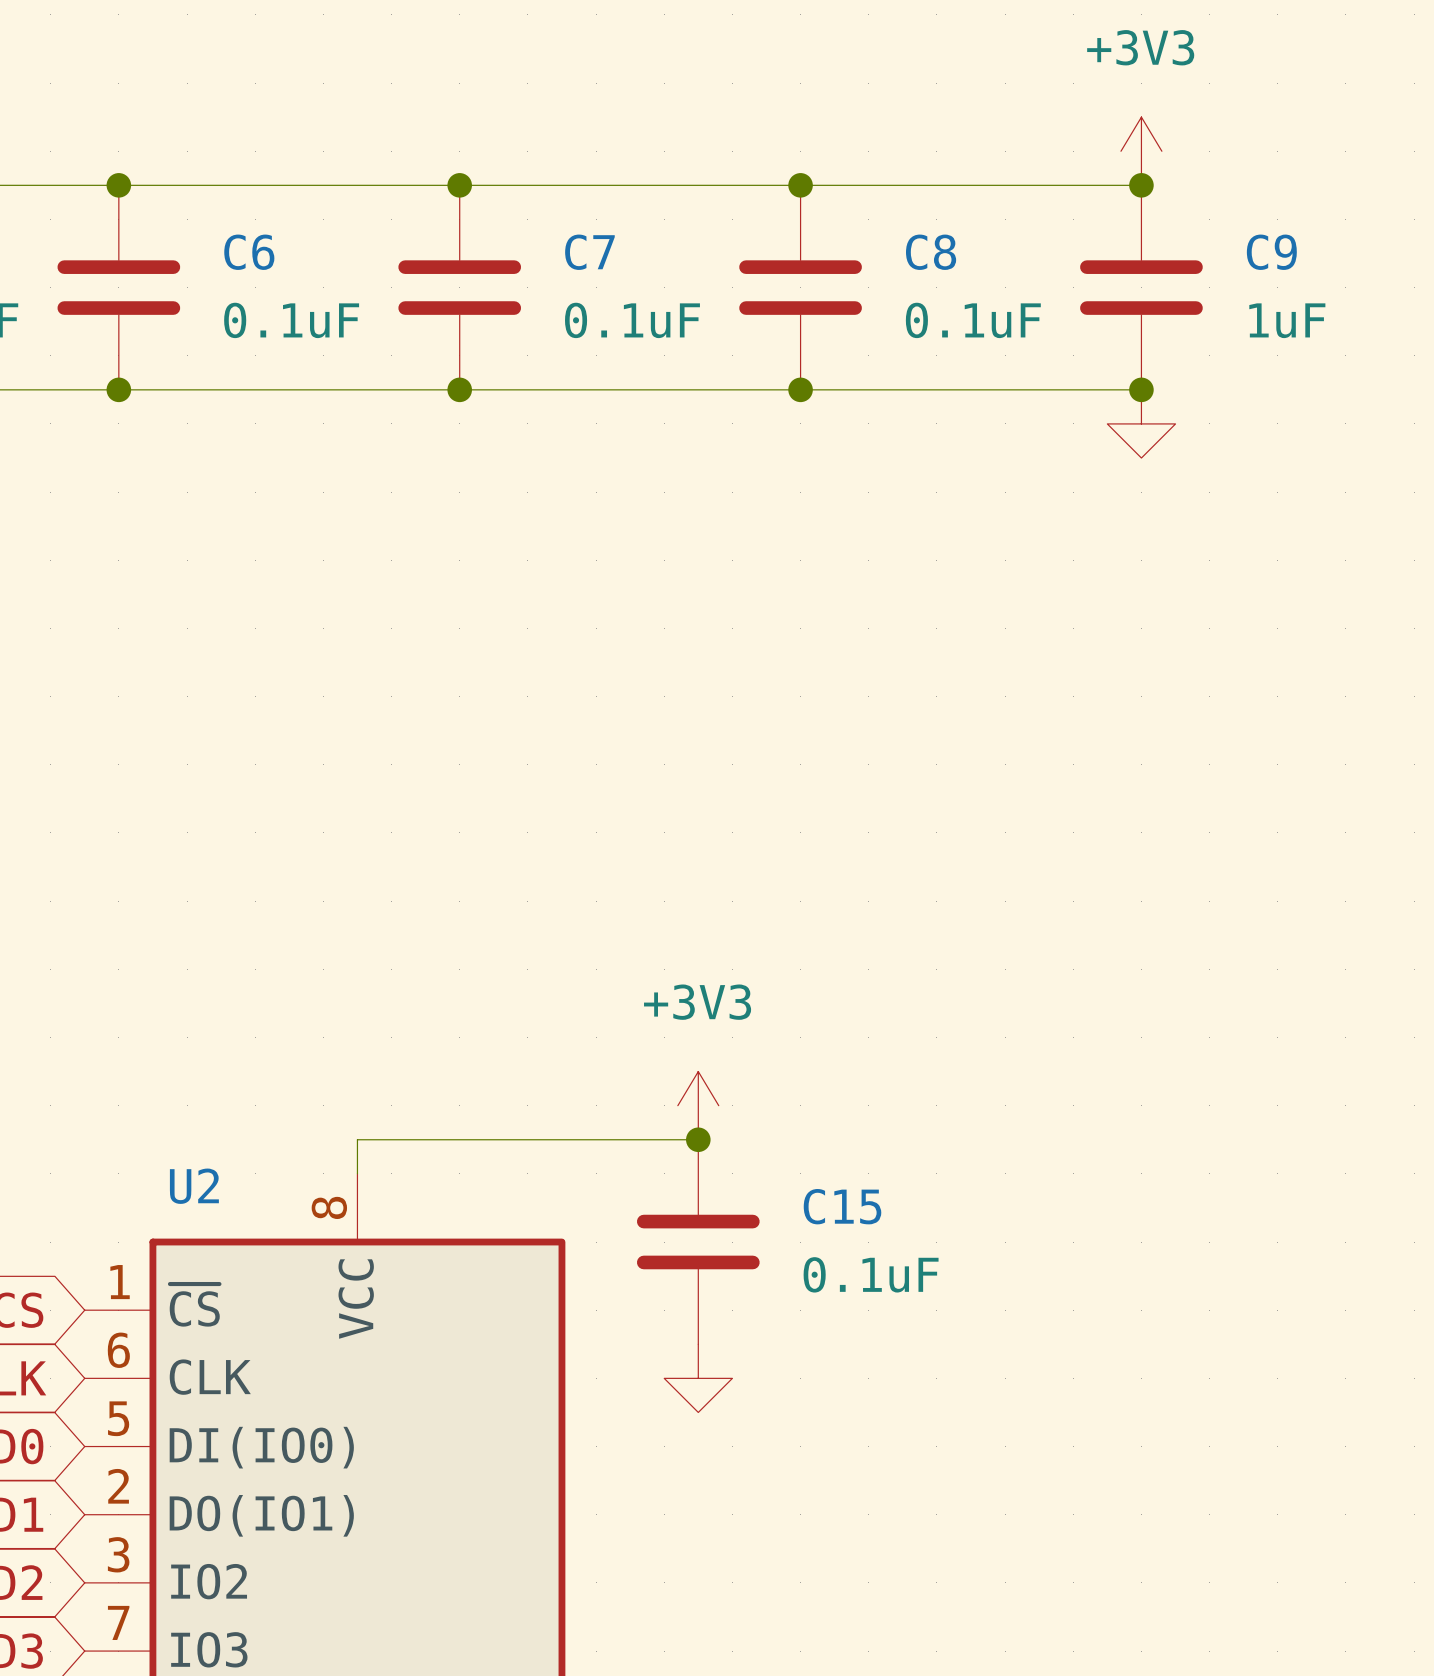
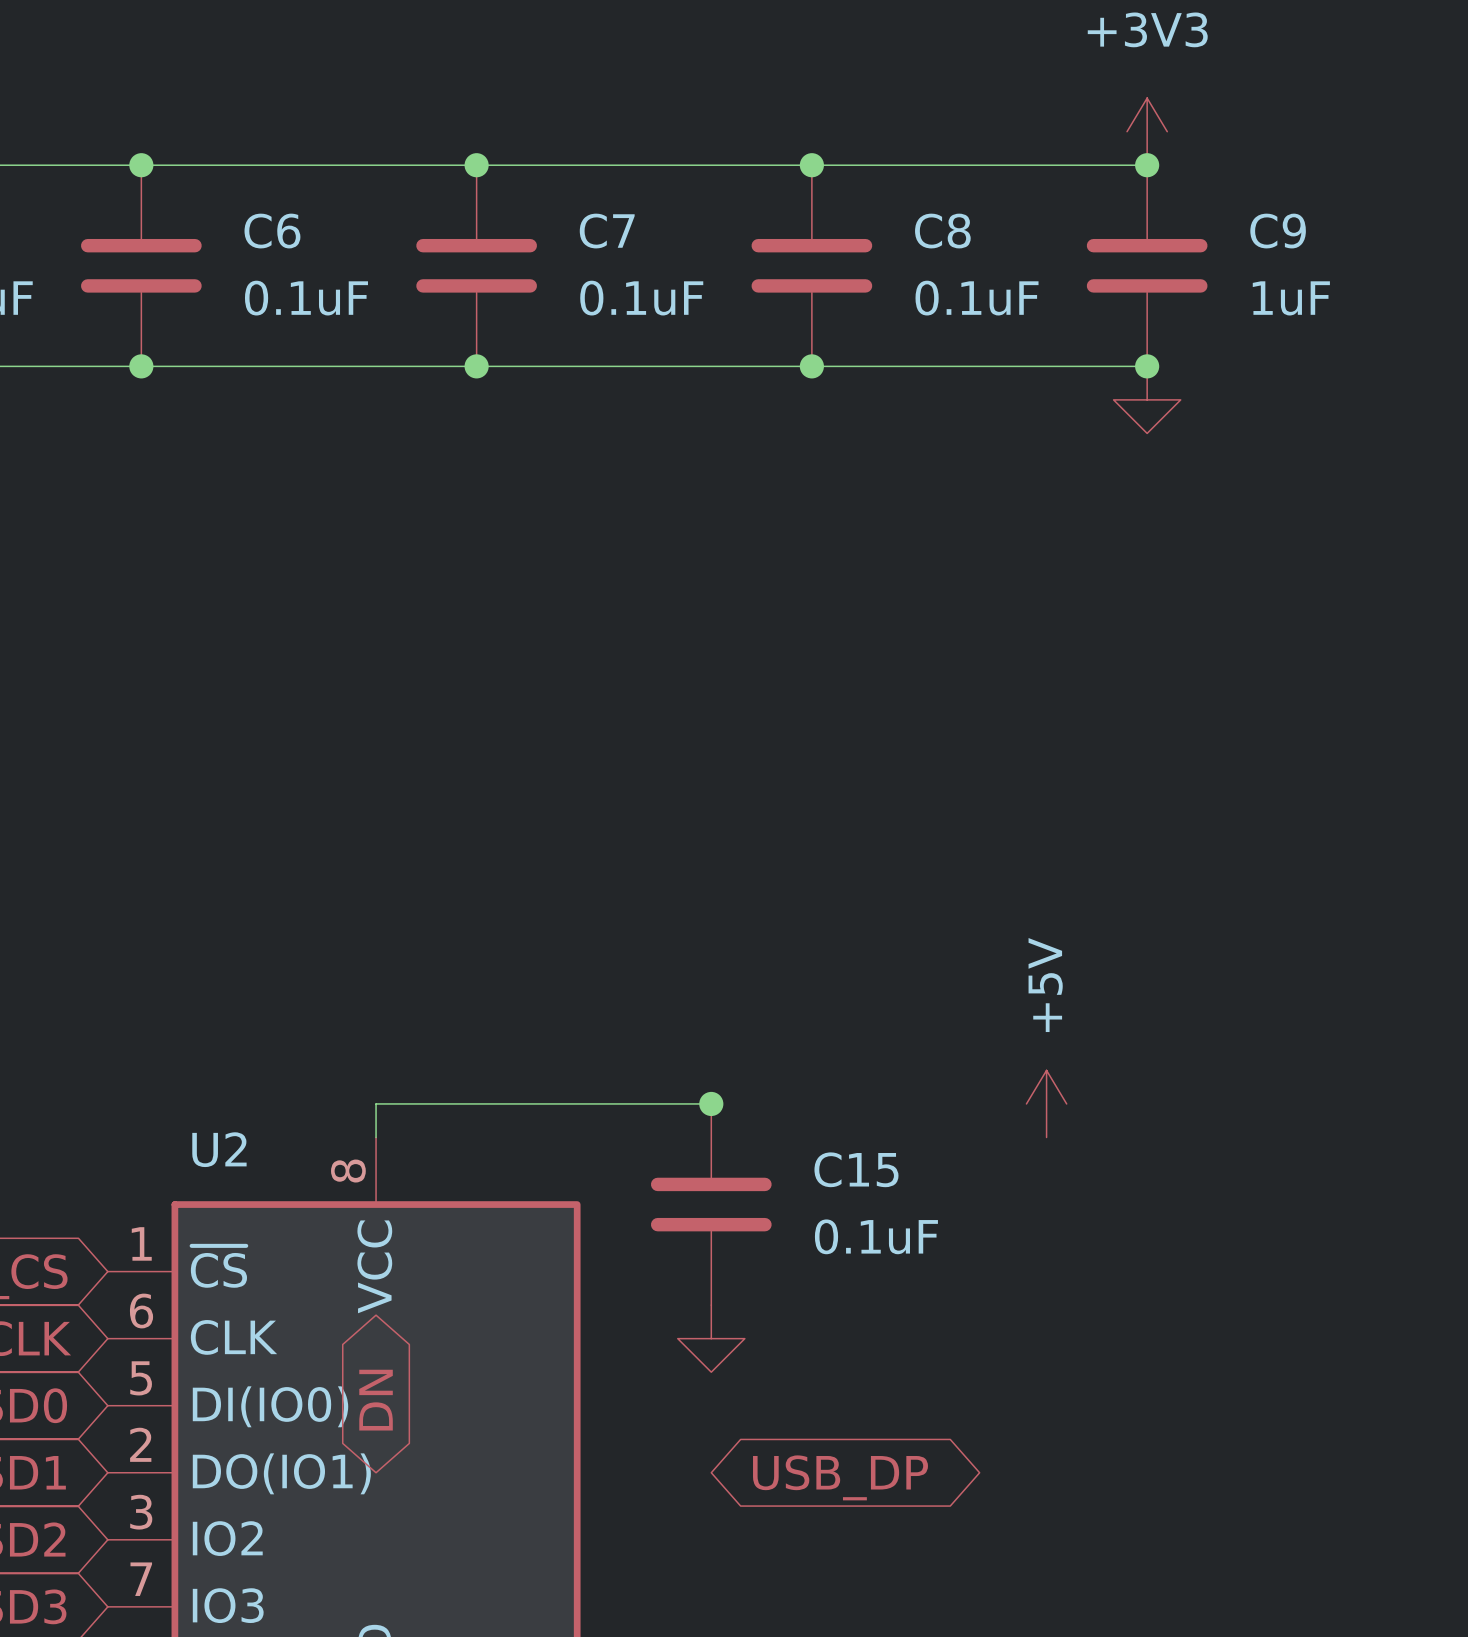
power symbol: +3V3 (698, 1105) -> none
power symbol: none -> +5V (1046, 1103)
global label: none -> DN (376, 1400)
global label: none -> USB_DP (840, 1477)

